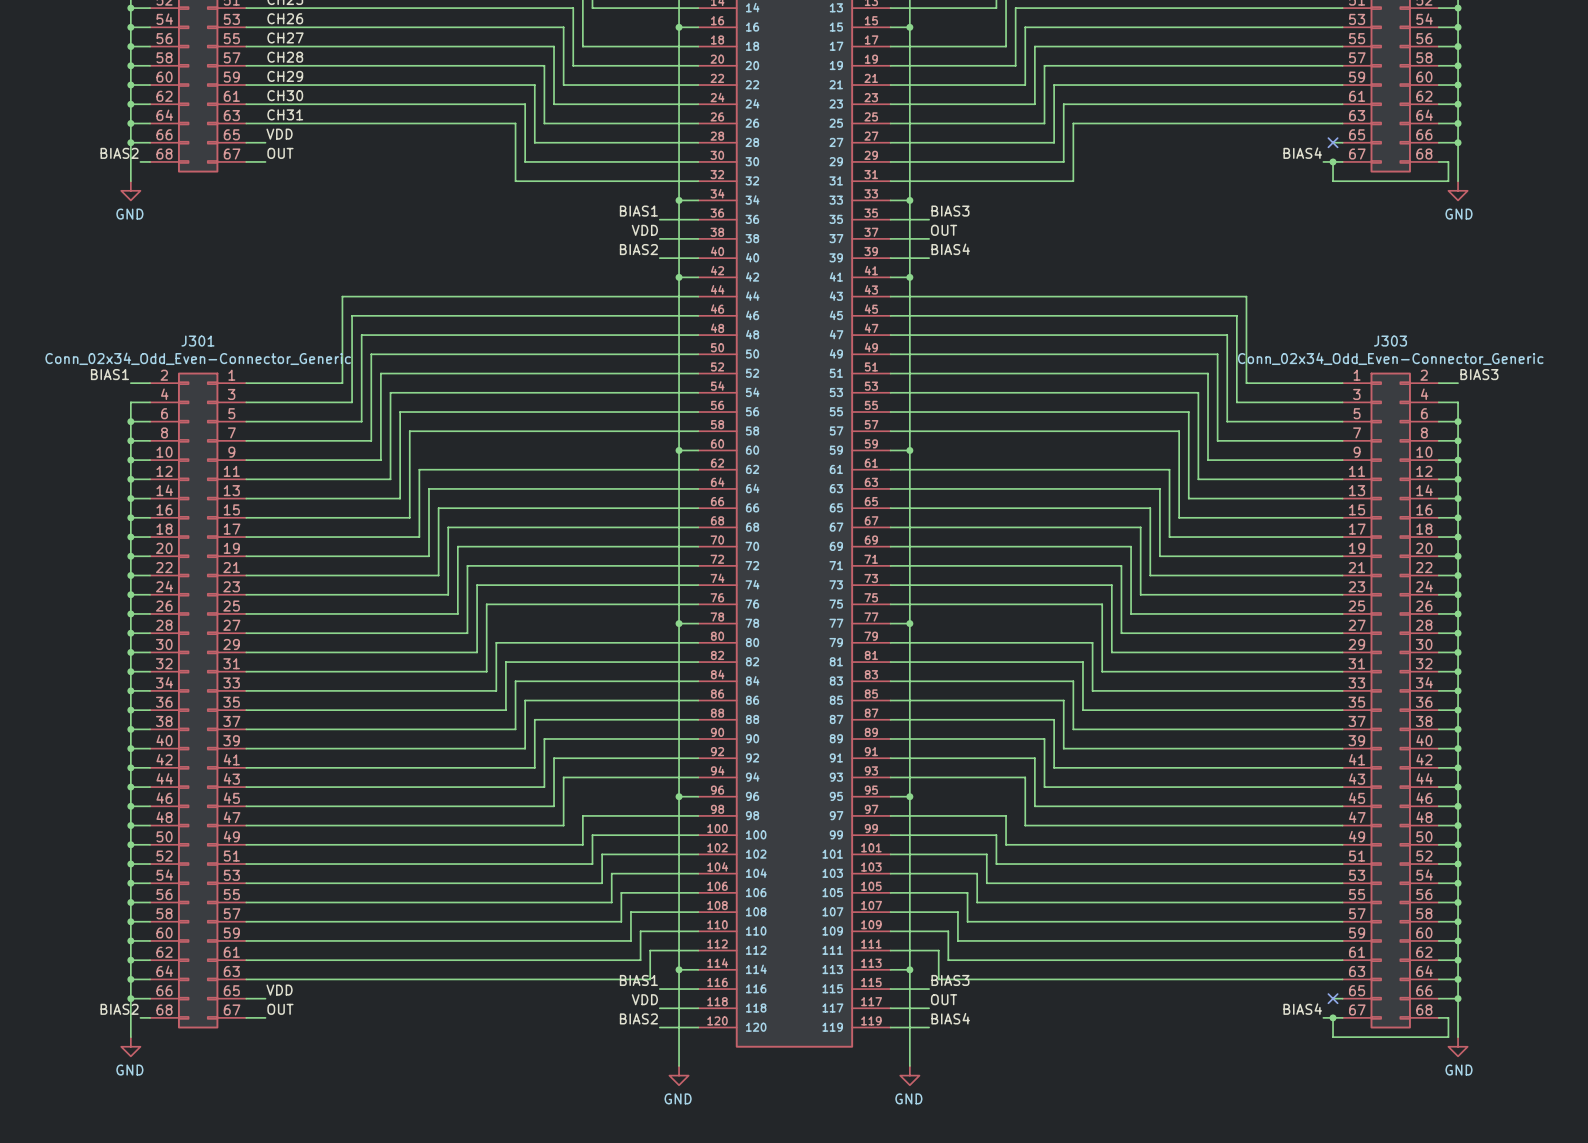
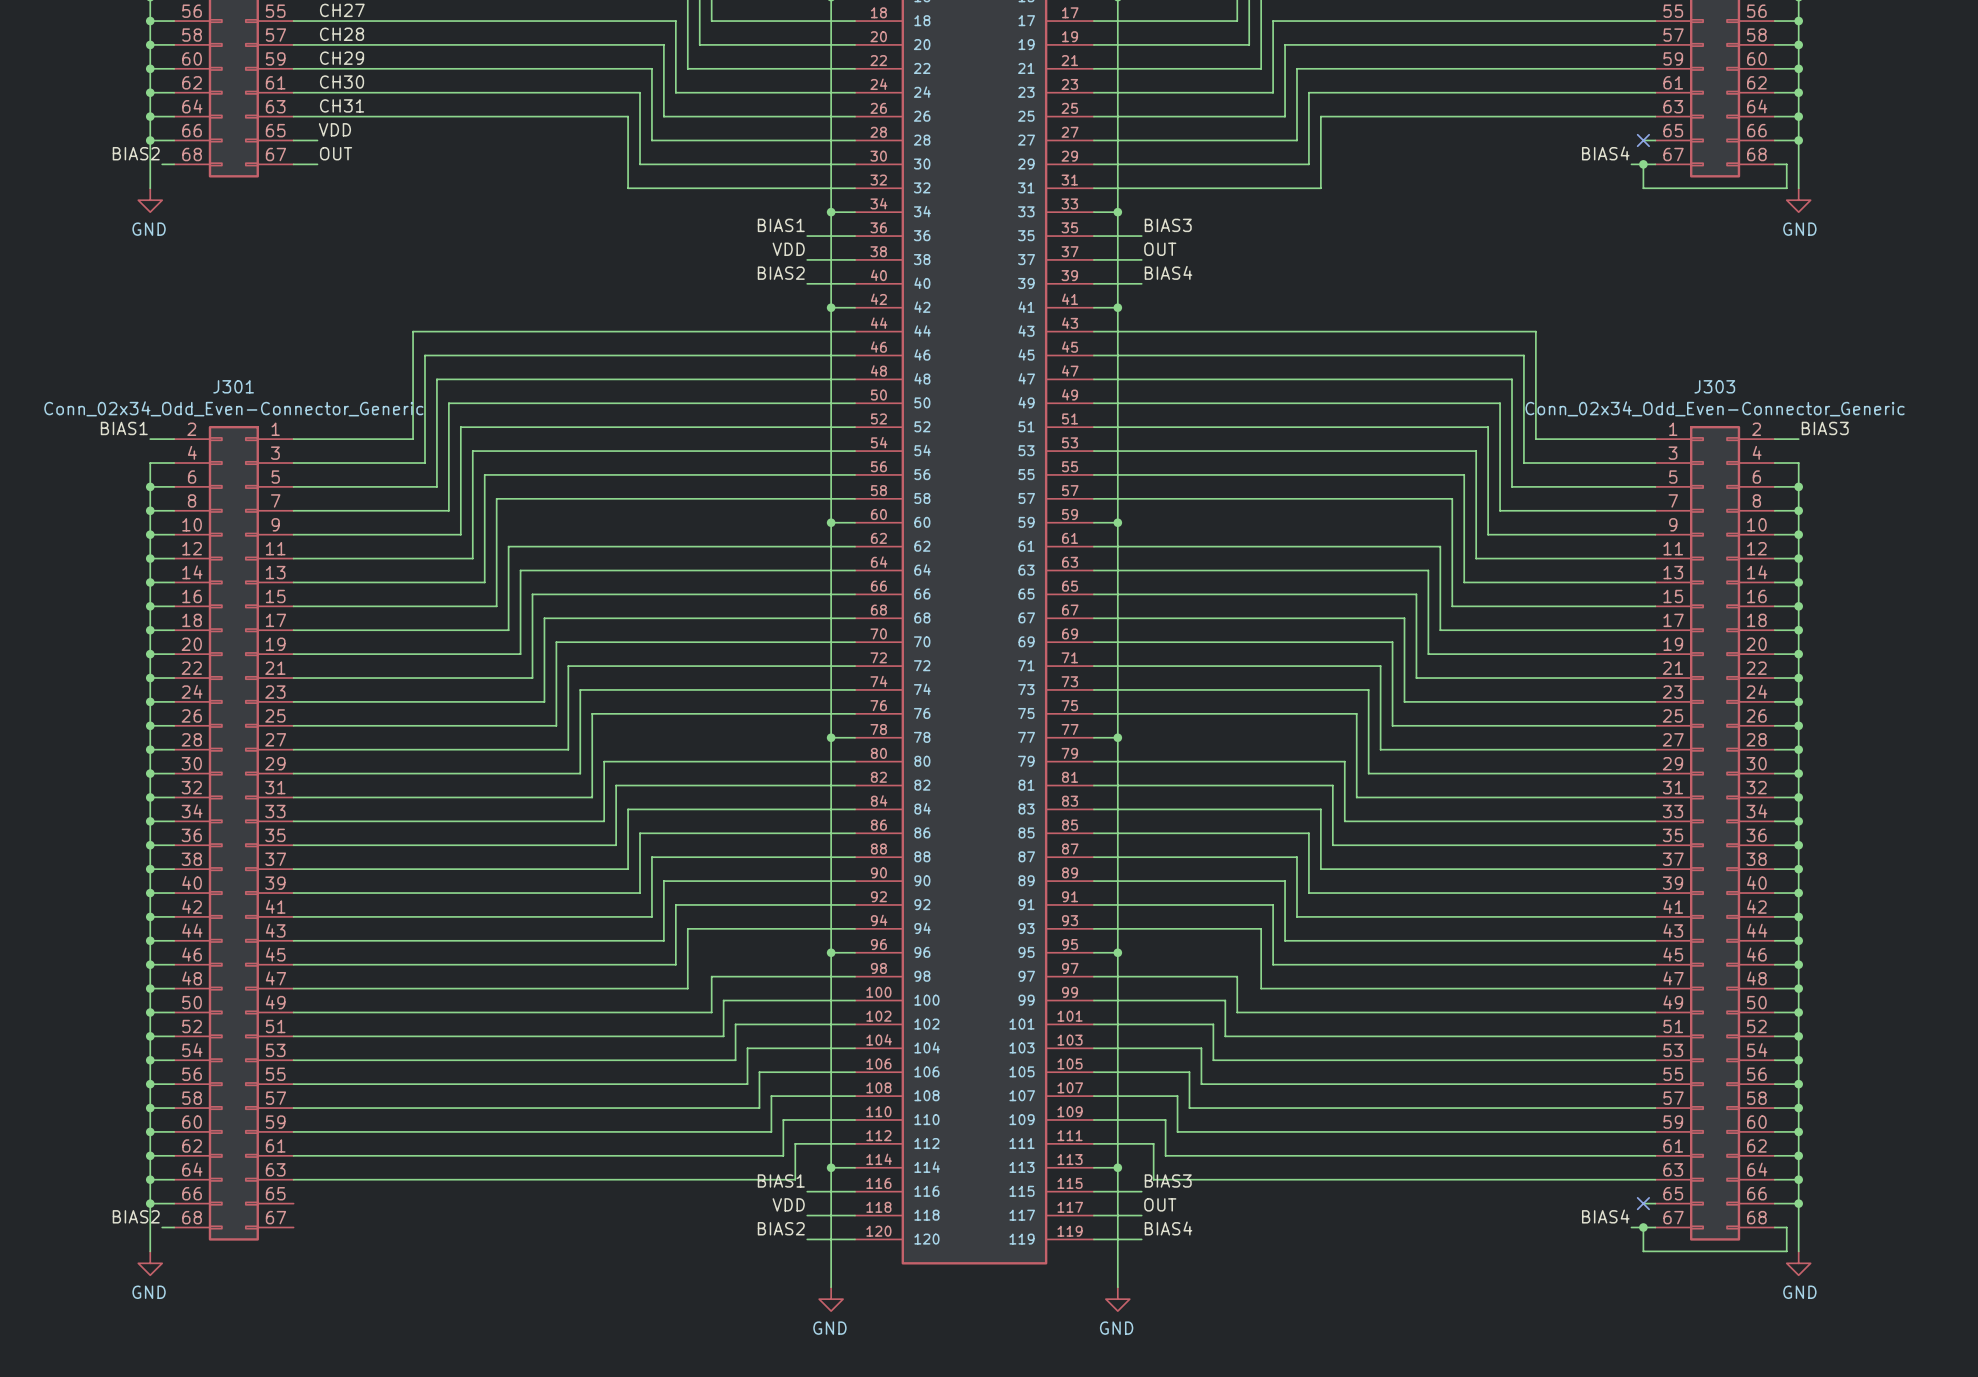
label: VDD (279, 990) -> none
wire: (246, 998) (265, 998) -> none
label: OUT (280, 1009) -> none
wire: (246, 1017) (265, 1017) -> none

